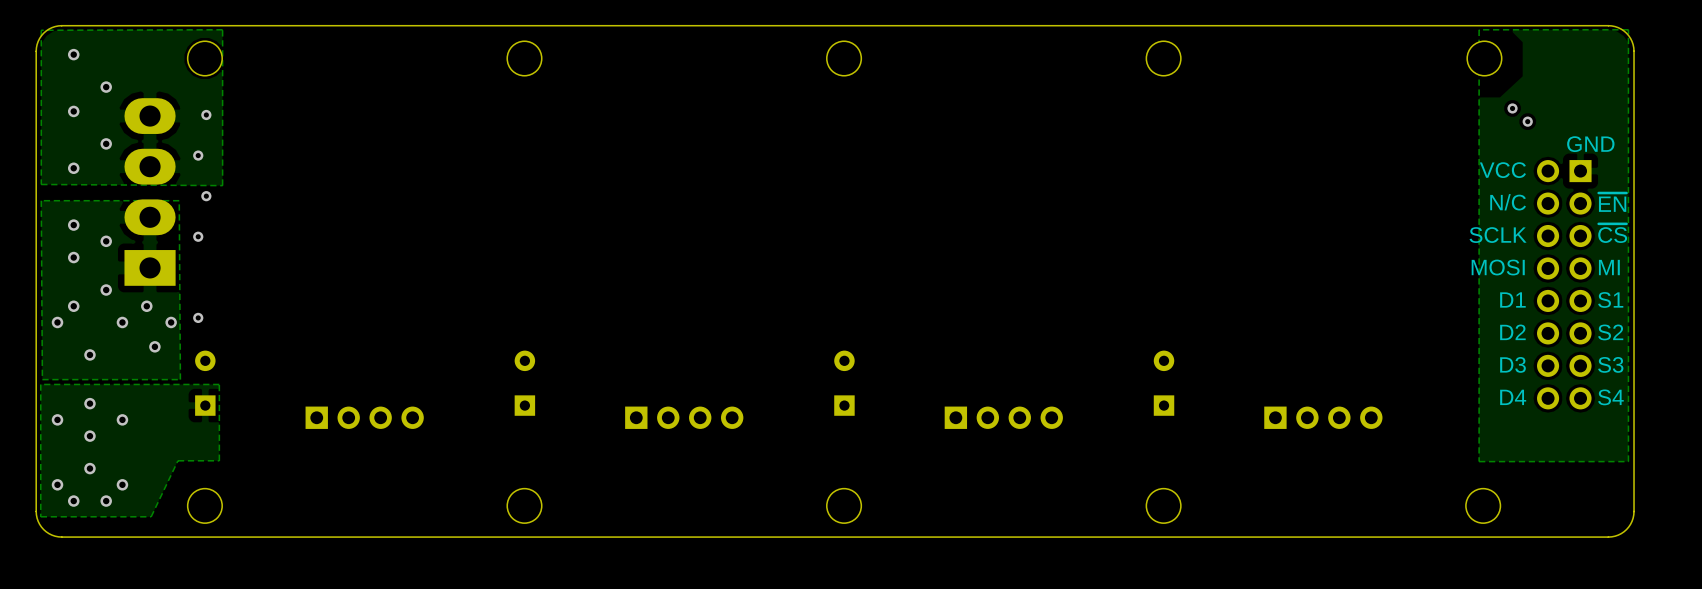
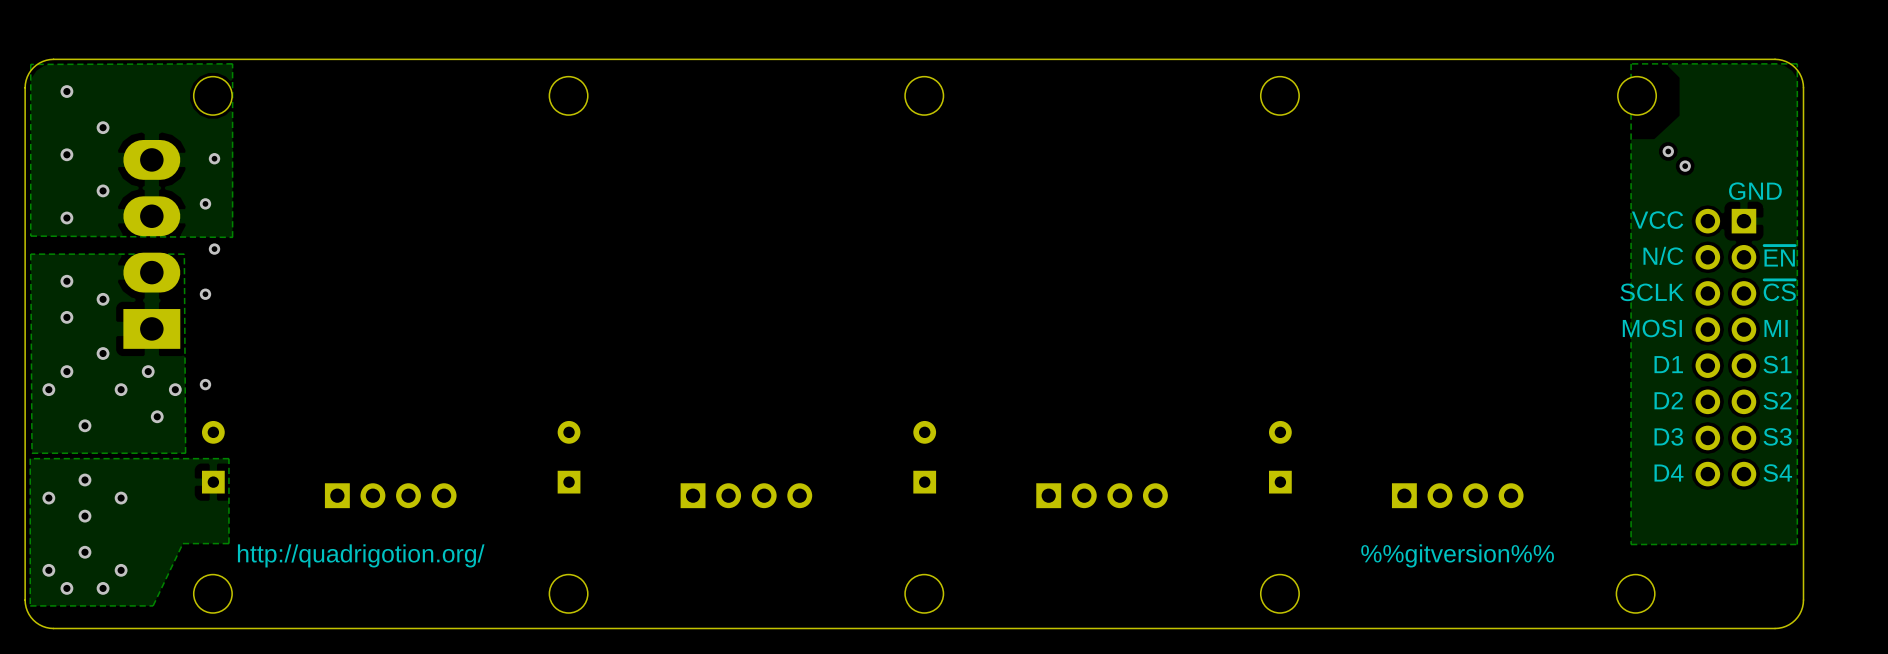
text: none -> http://quadrigotion.org/ (361, 555)
text: none -> %%gitversion%% (1457, 555)

